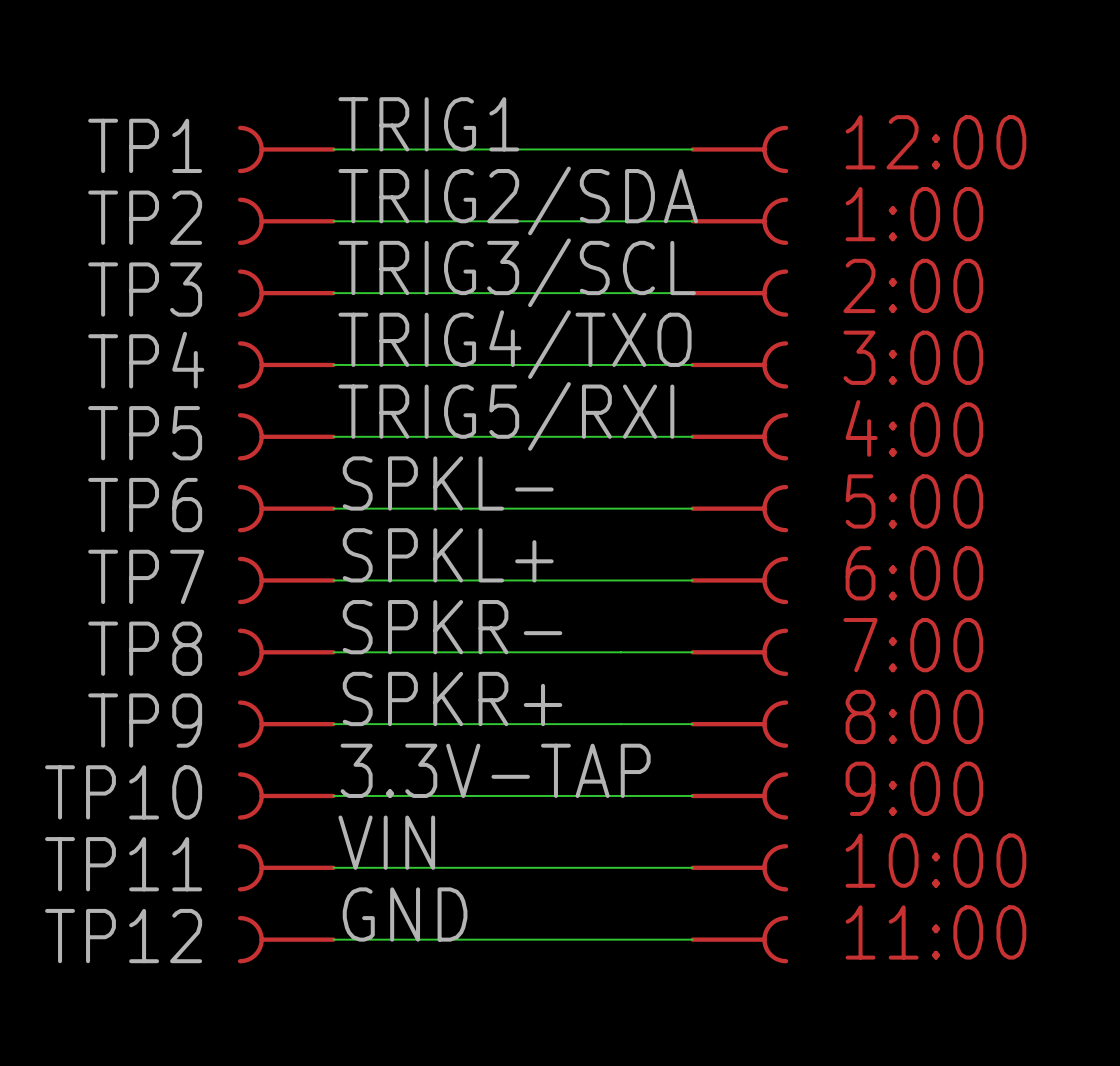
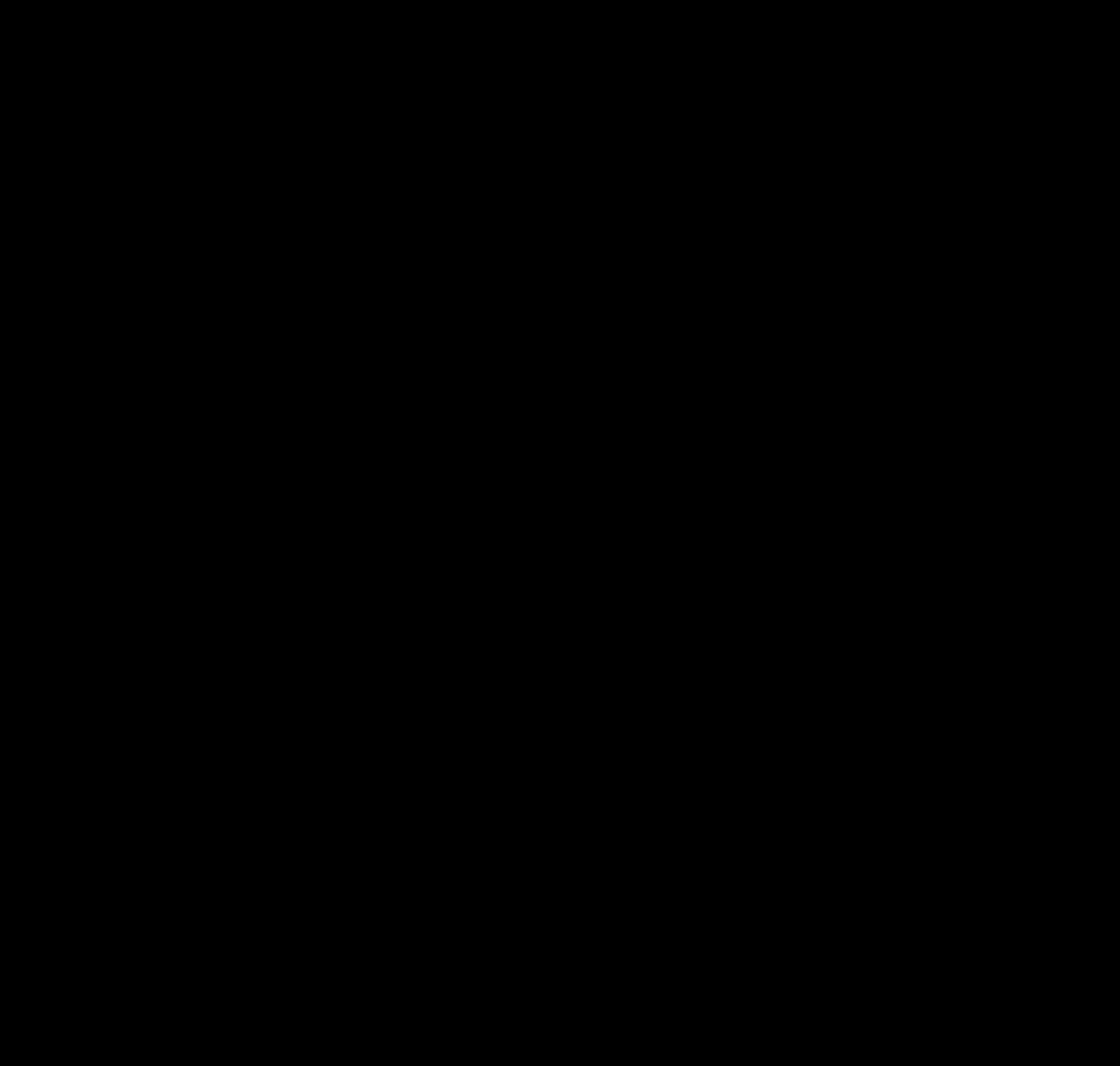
label: TRIG1 (428, 124) -> none
text: 12:00 (935, 142) -> none
TP1: (286, 149) -> none
wire: (333, 149) (692, 149) -> none
part: (739, 149) -> none
label: TRIG2/SDA (518, 200) -> none
text: 1:00 (914, 214) -> none
TP2: (286, 221) -> none
wire: (333, 221) (692, 221) -> none
part: (739, 221) -> none
label: TRIG3/SCL (517, 272) -> none
text: 2:00 (913, 285) -> none
TP3: (286, 293) -> none
wire: (333, 293) (692, 293) -> none
part: (739, 293) -> none
label: TRIG4/TXO (515, 344) -> none
text: 3:00 (913, 357) -> none
TP4: (286, 364) -> none
wire: (333, 364) (692, 364) -> none
part: (739, 364) -> none
label: TRIG5/RXI (506, 416) -> none
text: 4:00 (914, 428) -> none
TP5: (286, 436) -> none
wire: (333, 436) (692, 436) -> none
part: (739, 436) -> none
label: SPKL- (448, 483) -> none
text: 5:00 (914, 501) -> none
TP6: (286, 508) -> none
wire: (333, 508) (692, 508) -> none
part: (739, 508) -> none
label: SPKL+ (448, 555) -> none
text: 6:00 (914, 573) -> none
TP7: (286, 580) -> none
wire: (333, 580) (692, 580) -> none
part: (739, 580) -> none
label: SPKR- (452, 627) -> none
text: 7:00 (913, 645) -> none
TP8: (286, 652) -> none
wire: (333, 652) (692, 652) -> none
part: (739, 652) -> none
label: SPKR+ (452, 699) -> none
text: 8:00 (914, 716) -> none
TP9: (286, 724) -> none
wire: (333, 724) (692, 724) -> none
part: (739, 724) -> none
label: 3.3V-TAP (495, 770) -> none
text: 9:00 (914, 788) -> none
TP10: (286, 795) -> none
wire: (333, 795) (692, 795) -> none
part: (739, 795) -> none
label: VIN (386, 842) -> none
text: 10:00 (935, 860) -> none
TP11: (286, 867) -> none
wire: (333, 867) (692, 867) -> none
part: (739, 867) -> none
label: GND (405, 914) -> none
text: 11:00 (935, 932) -> none
TP12: (286, 939) -> none
wire: (333, 939) (692, 939) -> none
part: (739, 939) -> none

